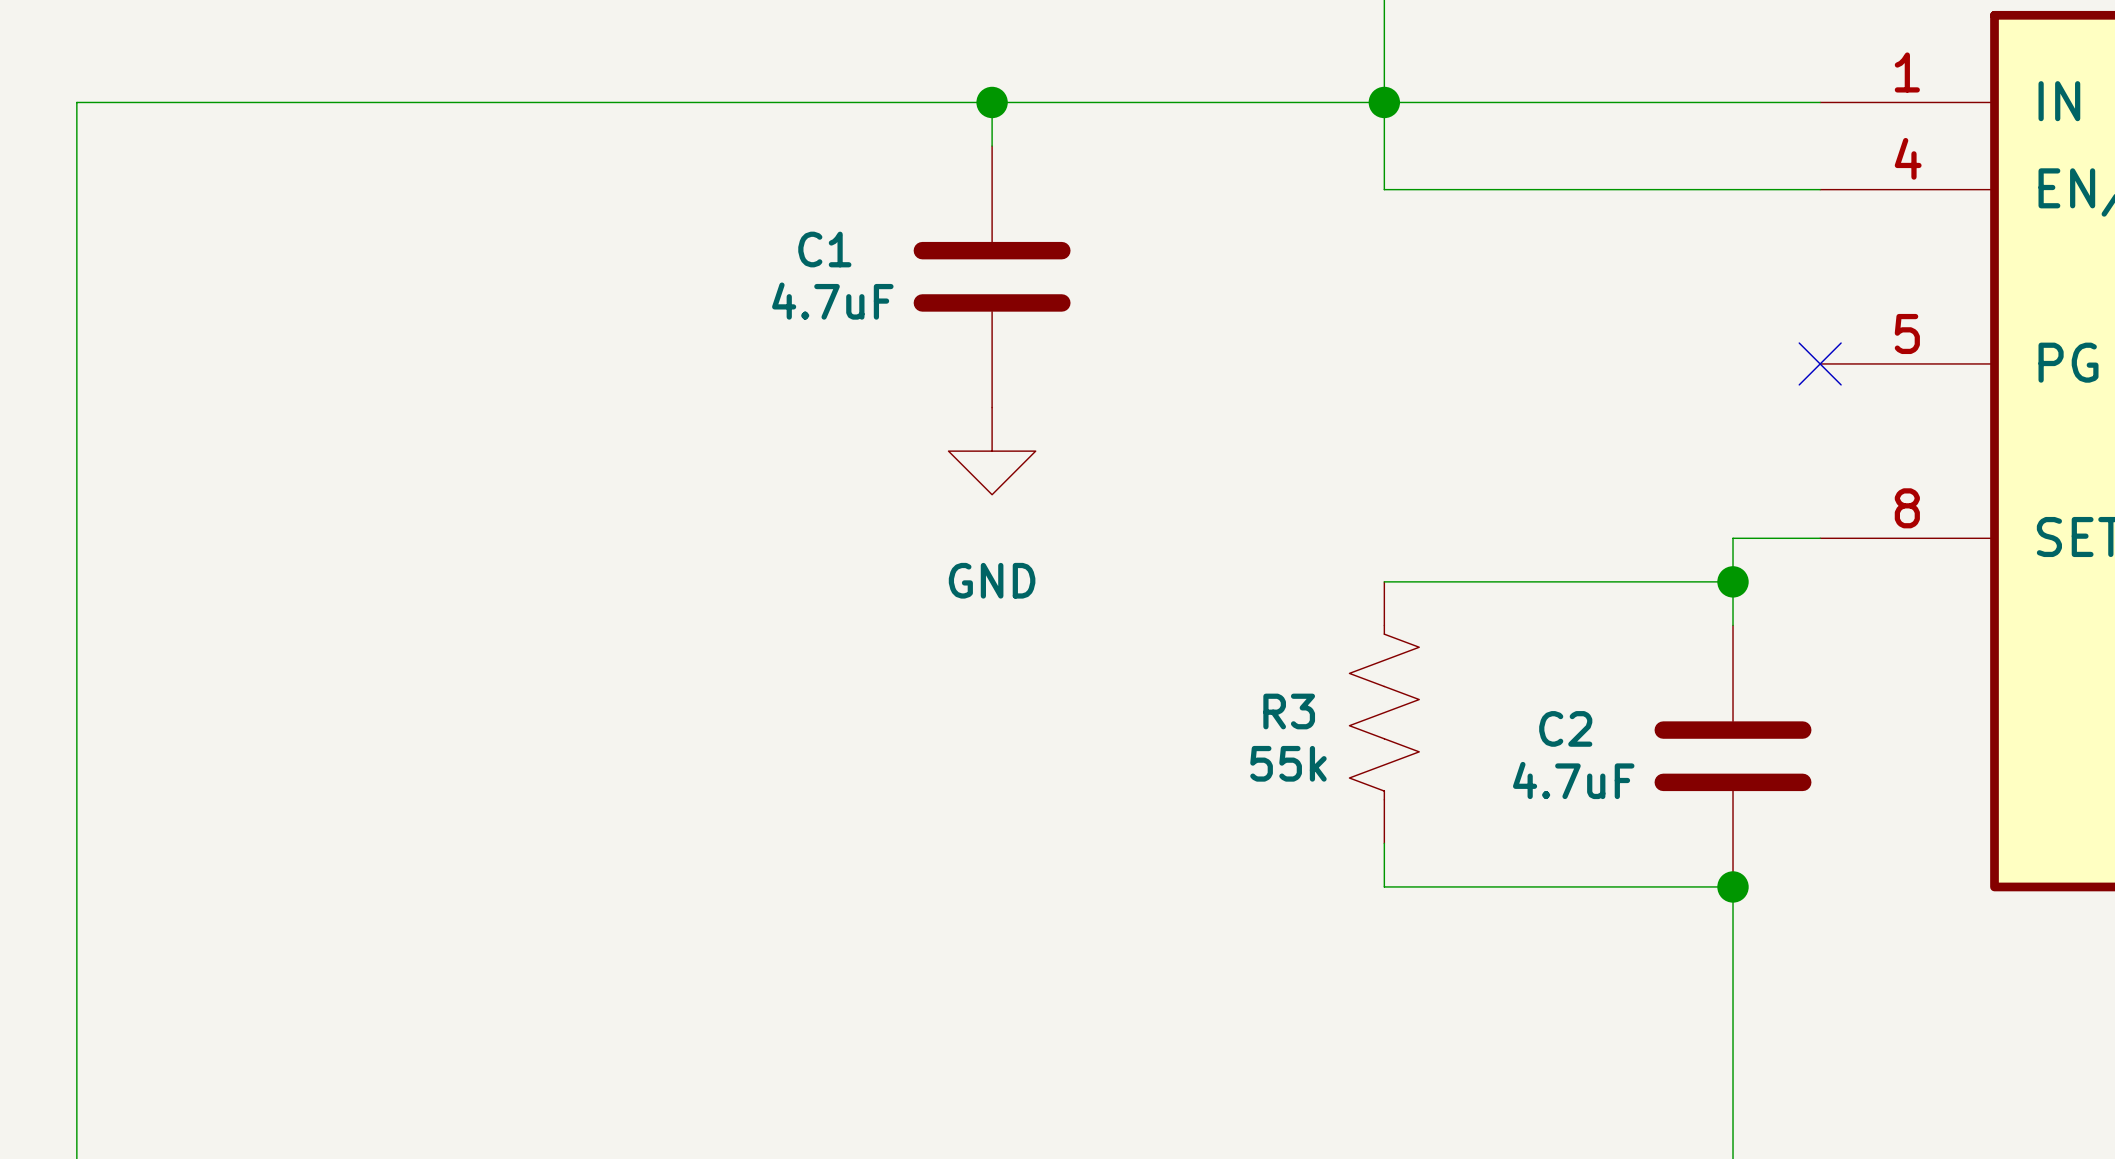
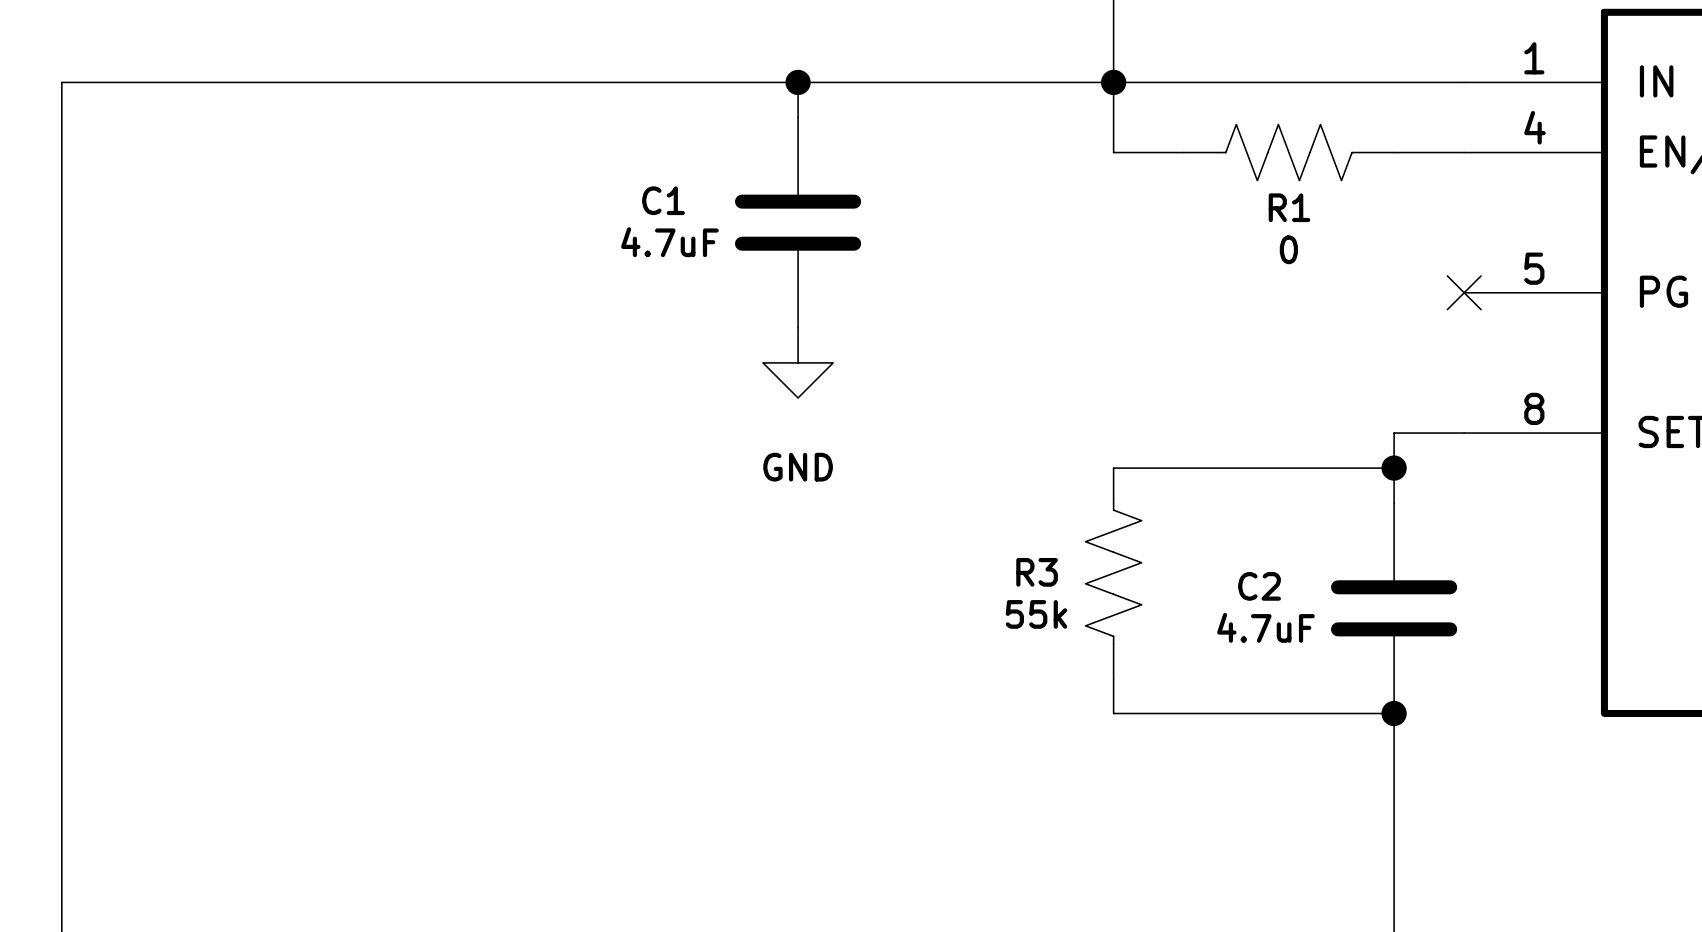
wire: (1471, 189) (1733, 189) -> none
R1: none -> 0 (1288, 152)

